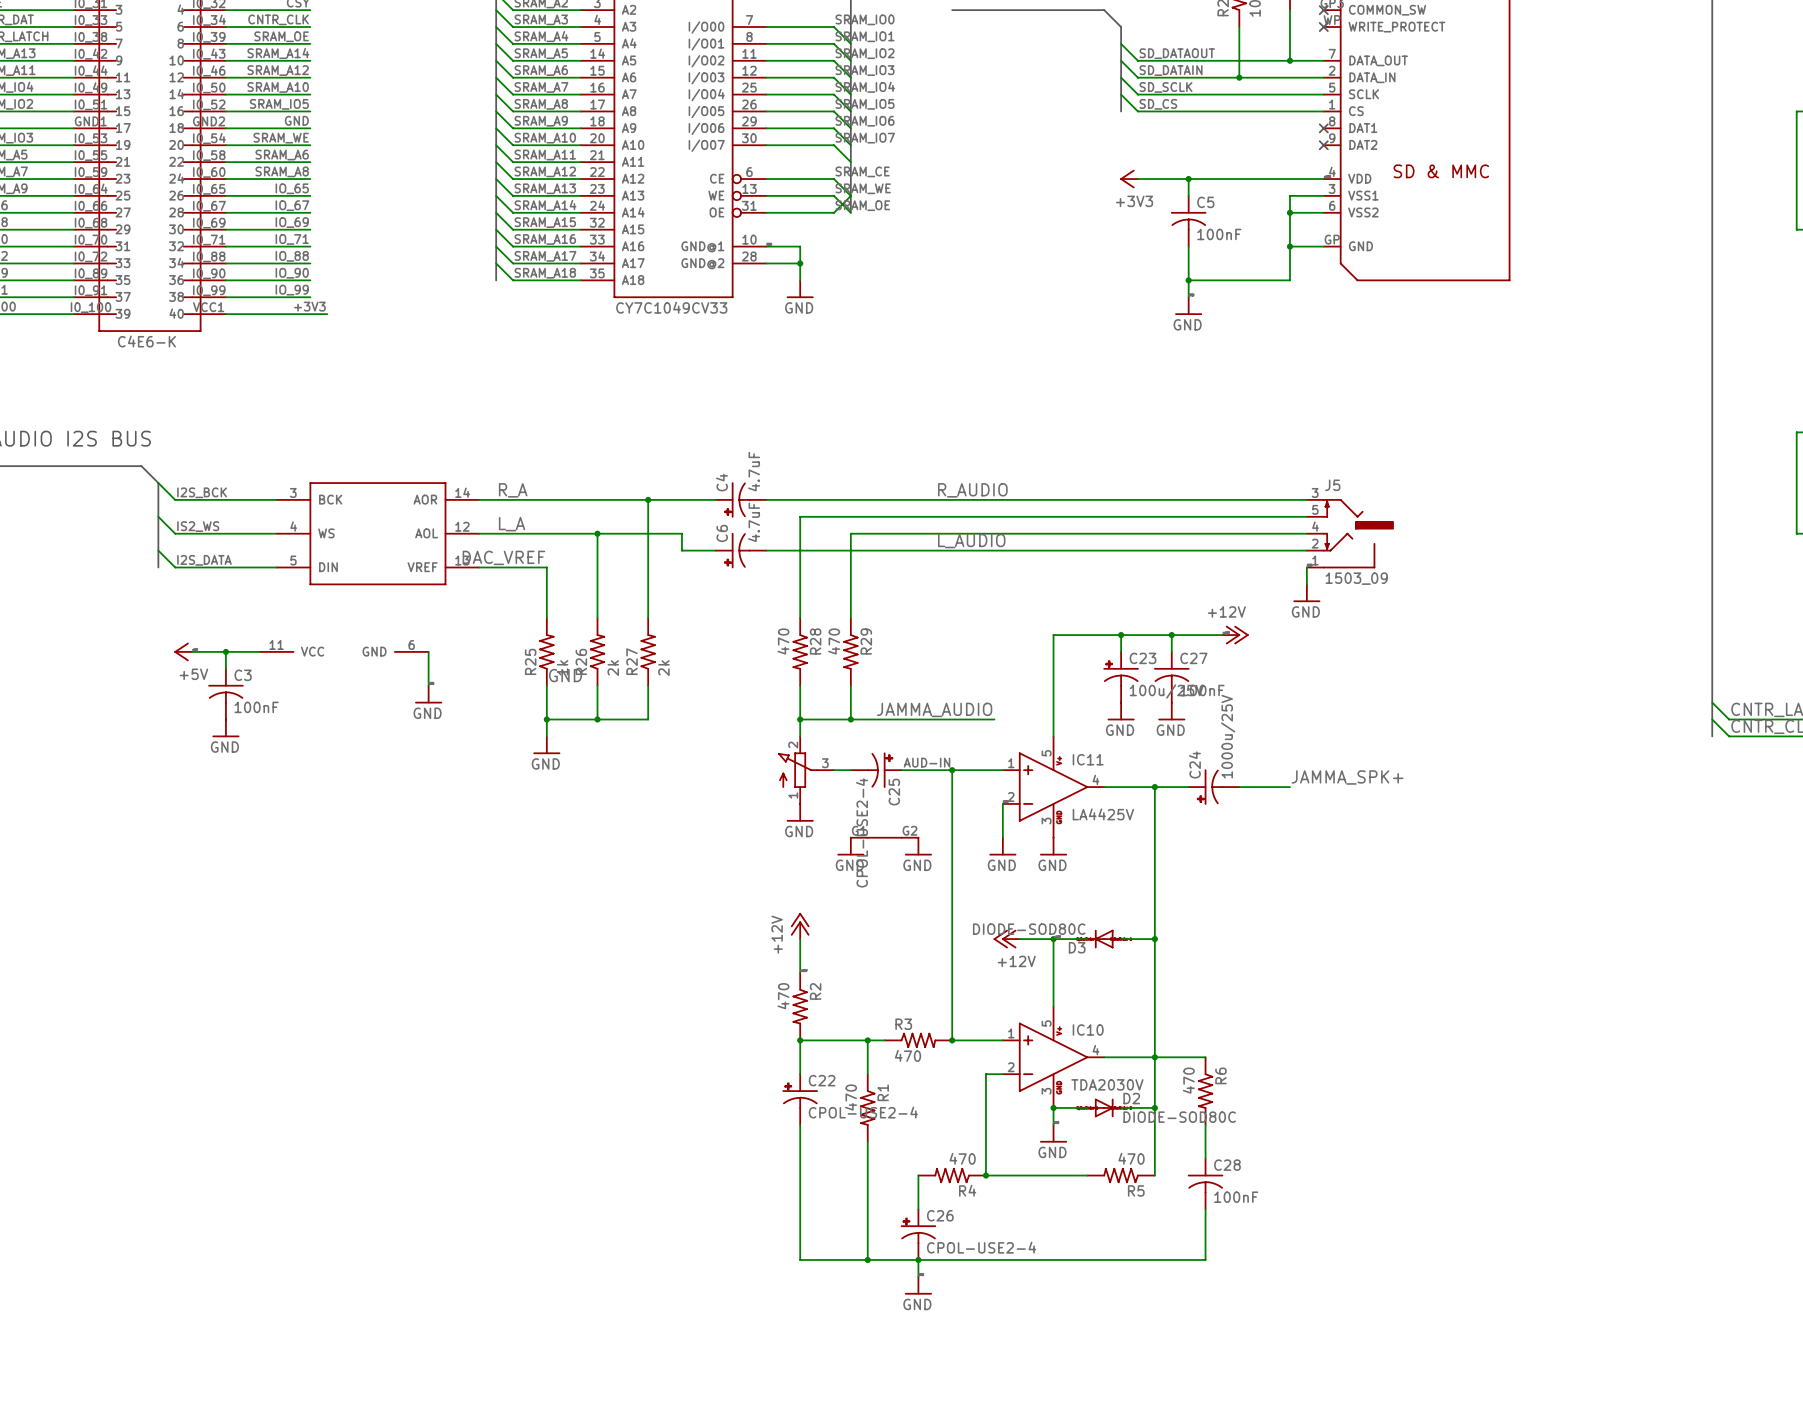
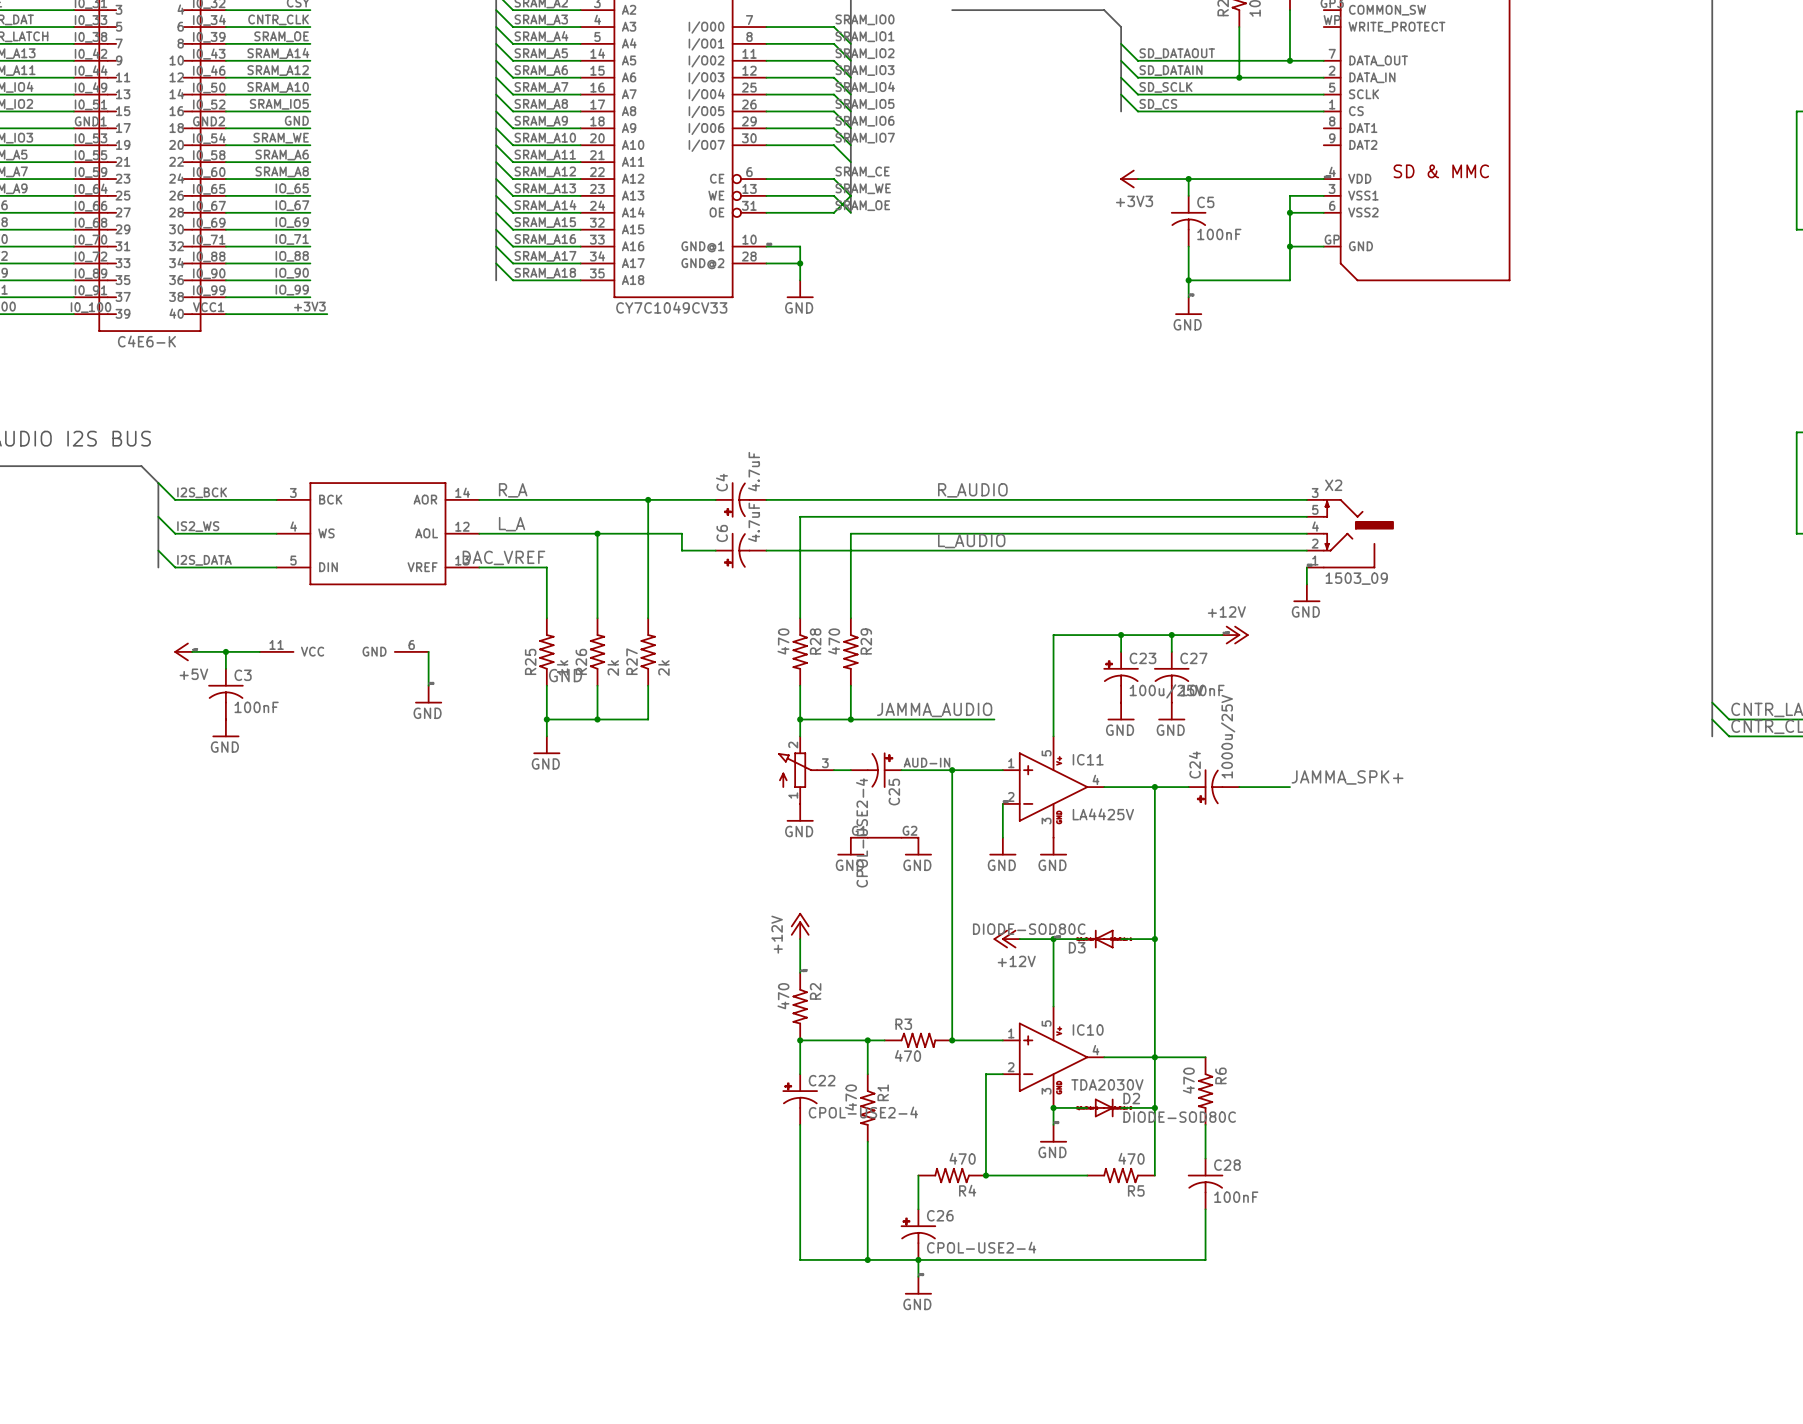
no-connect mark: (1323, 10) -> none
no-connect mark: (1323, 27) -> none
no-connect mark: (1323, 128) -> none
no-connect mark: (1323, 145) -> none
J5 name: J5 (1332, 485) -> X2 (1333, 485)

